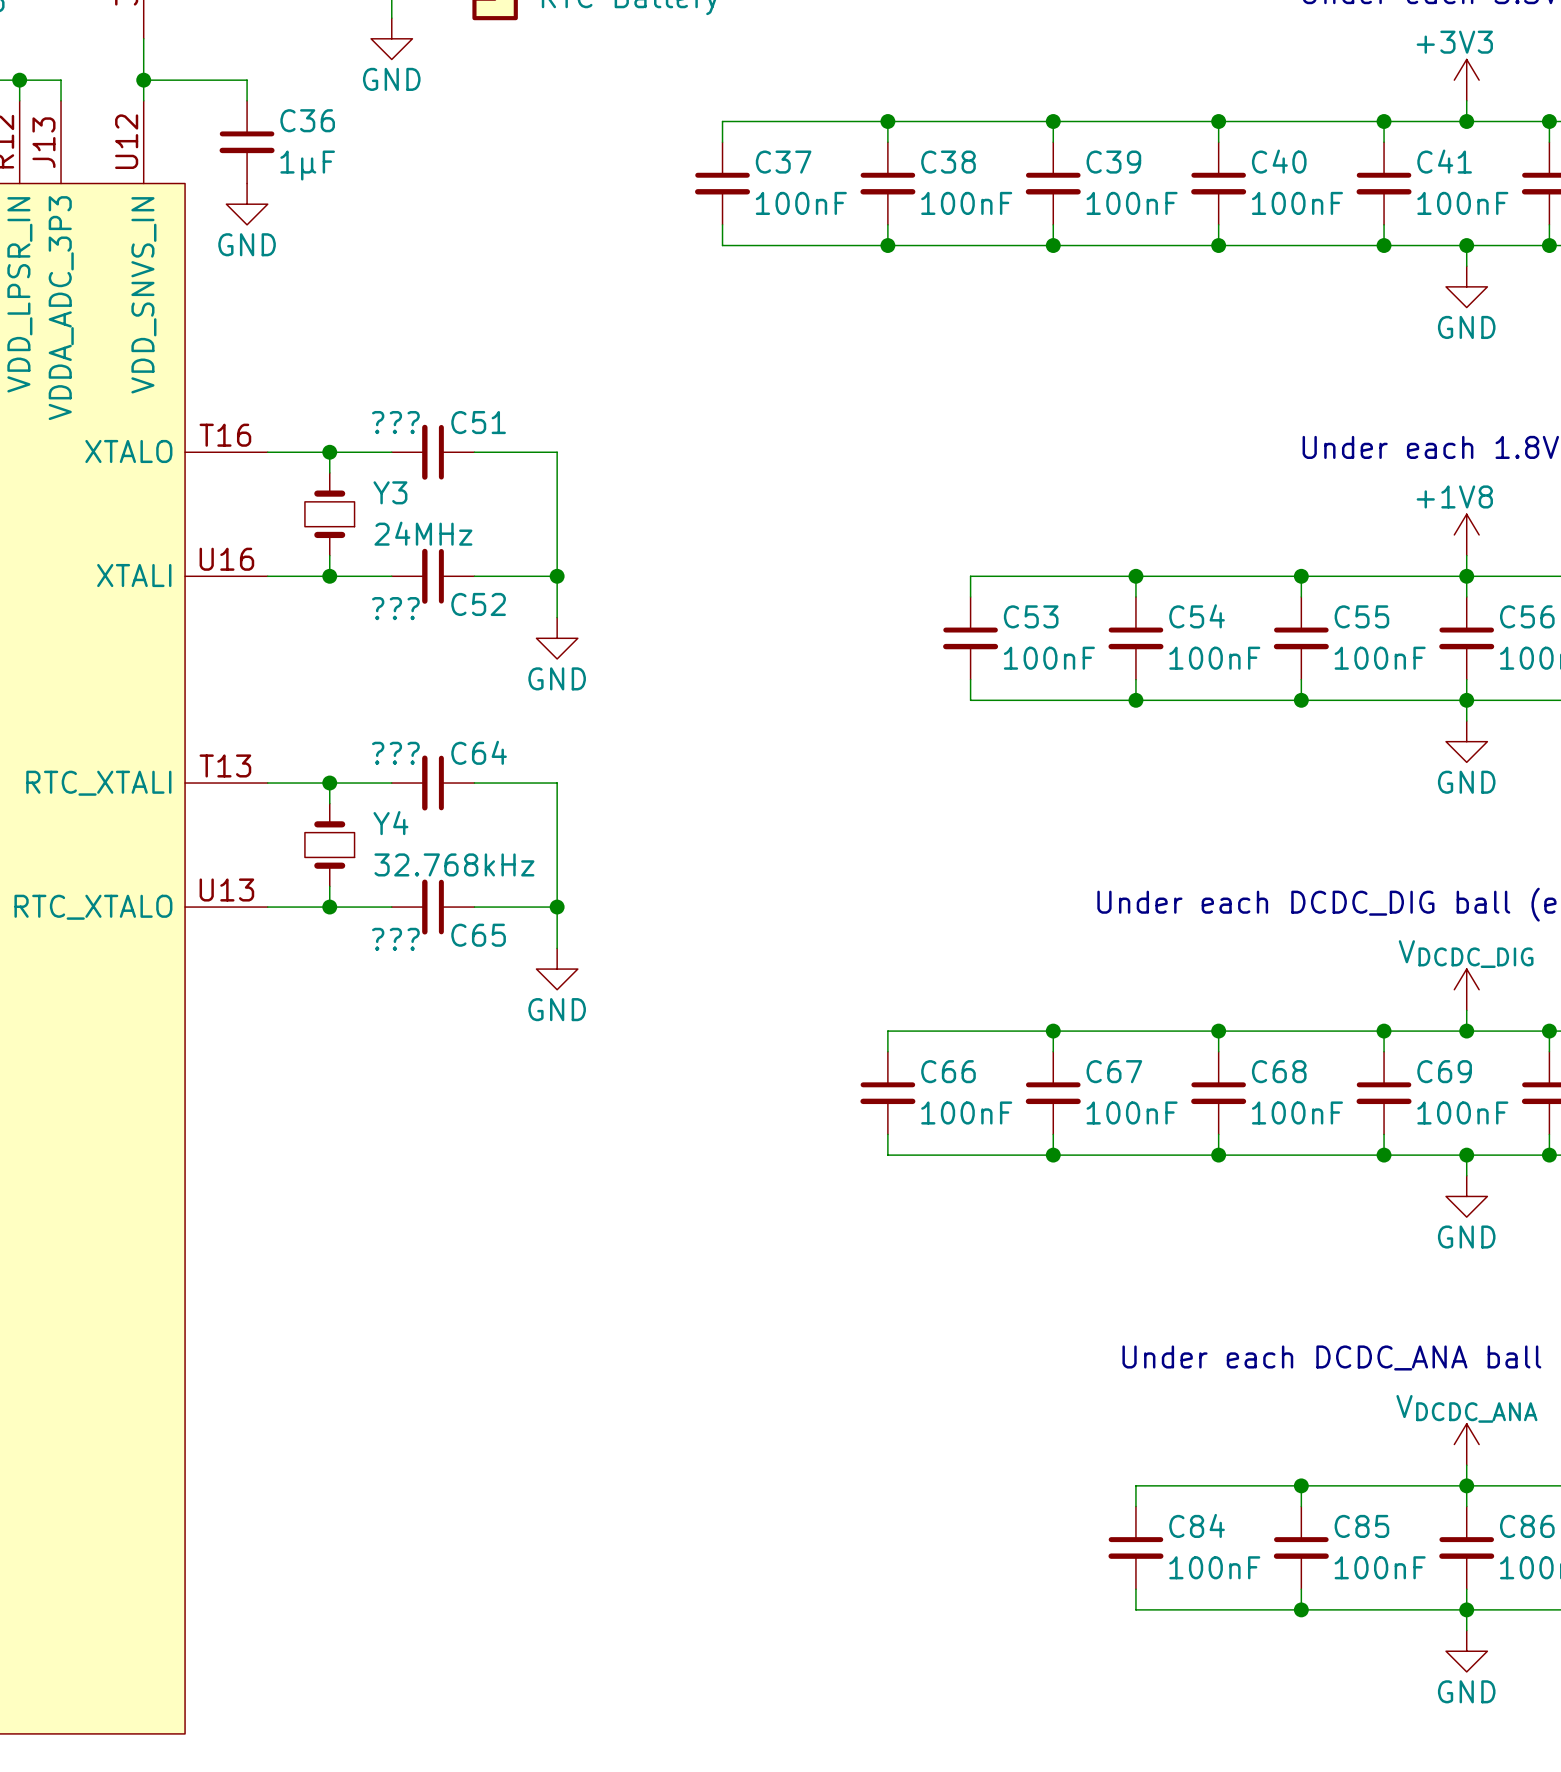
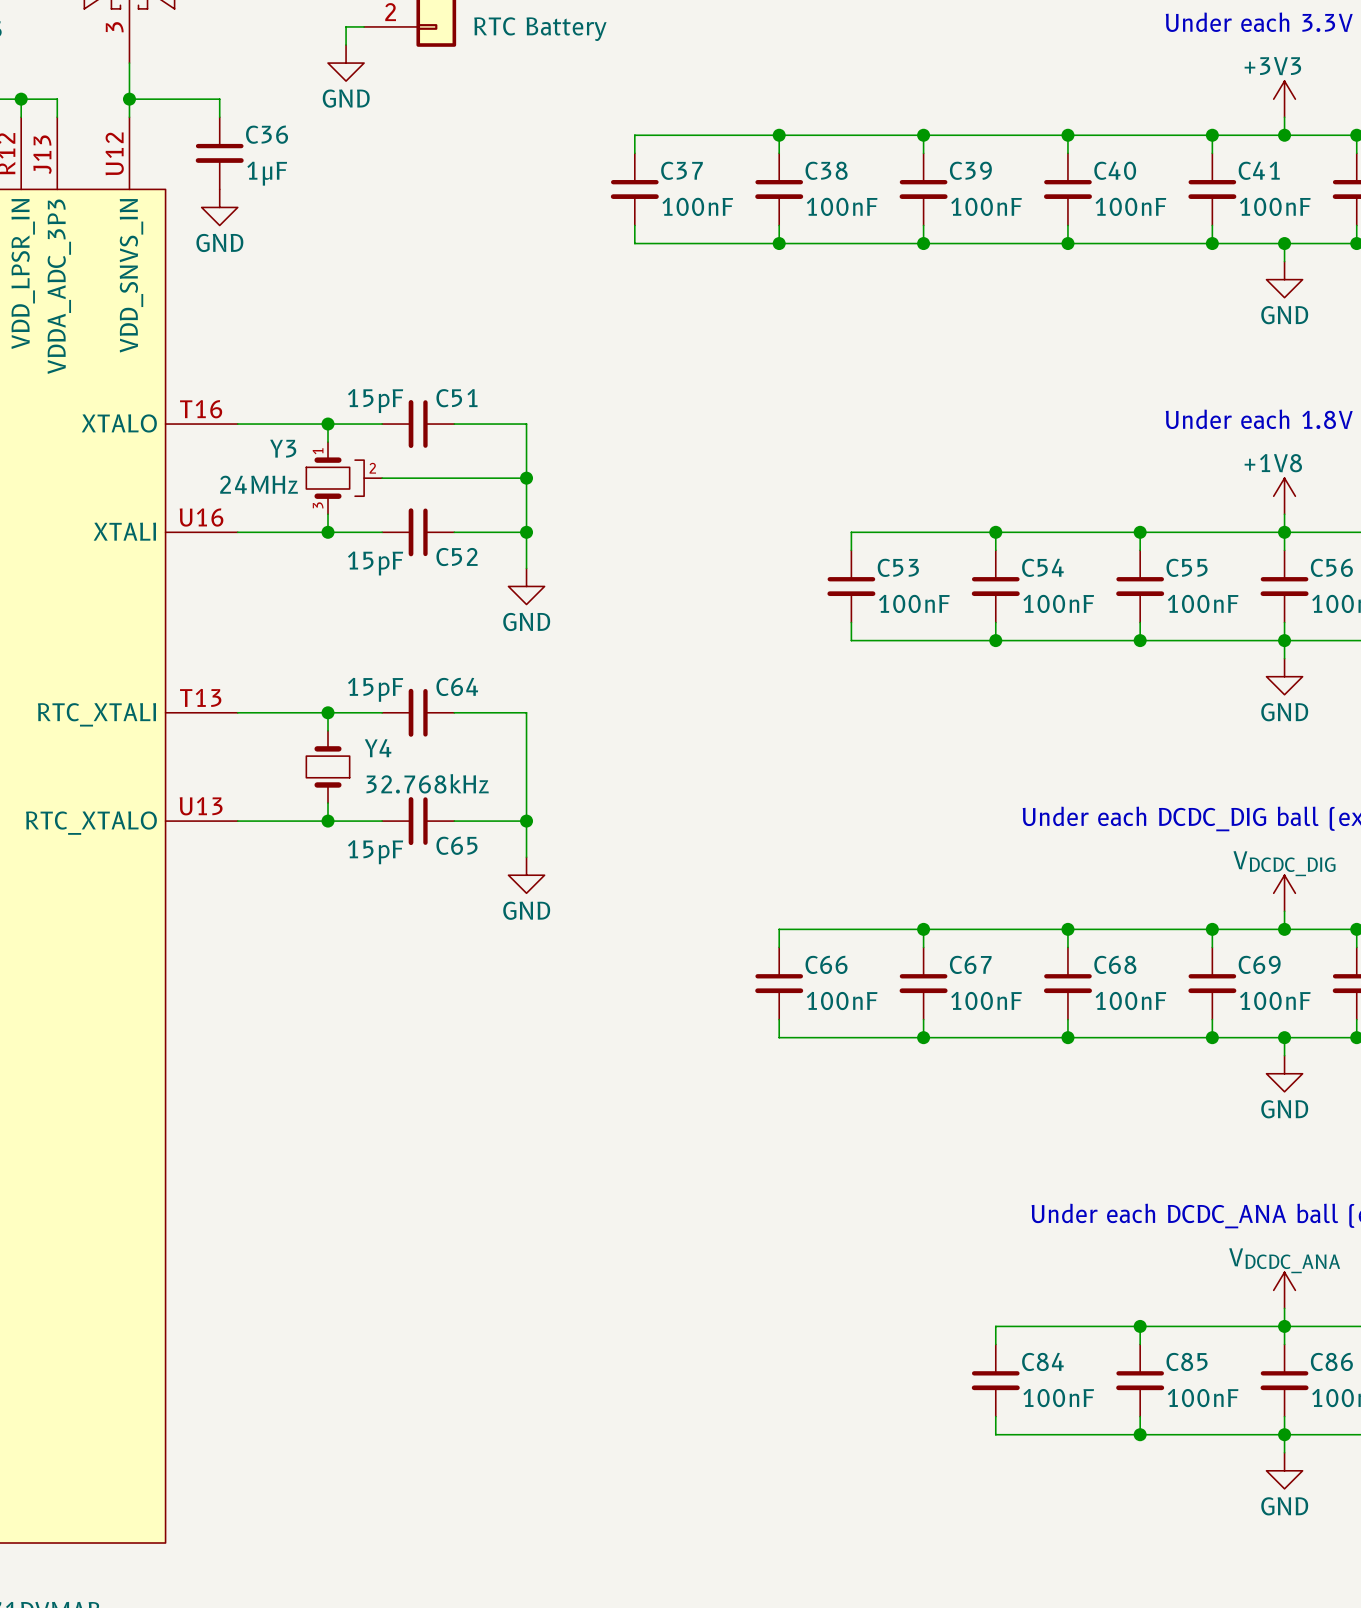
C51 value: ??? (395, 422) -> 15pF (375, 401)
wire: (329, 452) (329, 472) -> (328, 424) (328, 442)
junction position: (329, 452) -> (328, 424)
C51 position: (433, 452) -> (418, 424)
wire: (557, 452) (557, 617) -> (490, 424) (526, 424) (526, 568)
Y3 symbol: [304, 472, 355, 556] -> [306, 442, 383, 515]
Y3 name position: Y3 (390, 492) -> Y3 (283, 448)
wire: none -> (382, 478) (526, 478)
junction: none -> (526, 478)
Y3 value position: 24MHz (423, 533) -> 24MHz (259, 484)
wire: (329, 555) (329, 576) -> (328, 514) (328, 532)
junction position: (329, 576) -> (328, 532)
C52 position: (433, 576) -> (418, 532)
wire: none -> (490, 532) (526, 532)
junction: (557, 576) -> none
junction: none -> (526, 532)
C52 value: ??? (395, 608) -> 15pF (375, 563)
power symbol position: GND (557, 638) -> GND (526, 586)
C64 value: ??? (395, 753) -> 15pF (375, 689)
wire: (329, 783) (329, 803) -> (328, 712) (328, 730)
junction position: (329, 783) -> (328, 712)
C64 position: (433, 783) -> (418, 712)
wire: (557, 783) (557, 948) -> (490, 712) (526, 712) (526, 857)
Y4 position: (329, 845) -> (328, 766)
wire: (329, 886) (329, 907) -> (328, 803) (328, 821)
junction position: (329, 907) -> (328, 821)
C65 position: (433, 907) -> (418, 821)
wire: none -> (490, 821) (526, 821)
junction position: (557, 907) -> (526, 821)
C65 value: ??? (395, 939) -> 15pF (375, 852)
power symbol position: GND (557, 969) -> GND (526, 875)

